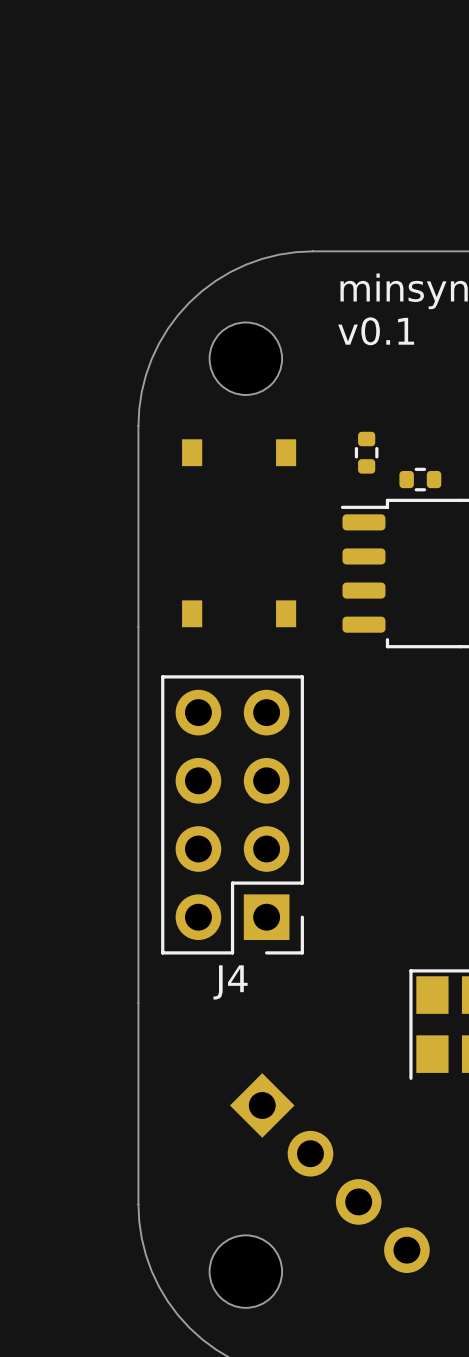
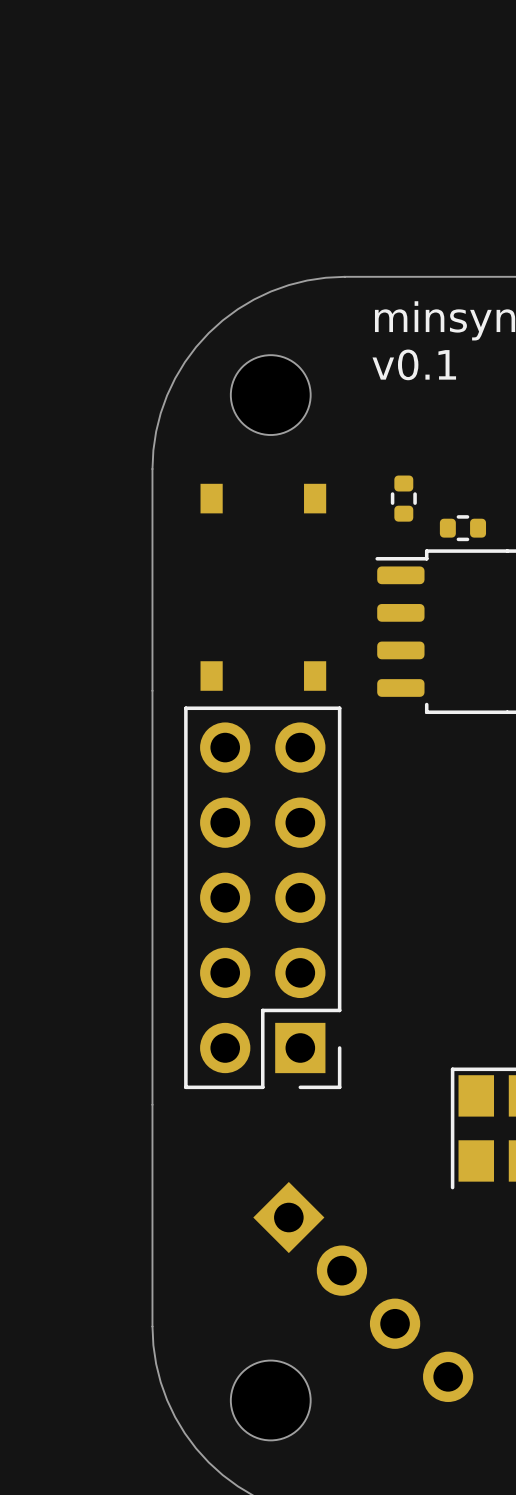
J4: (232, 814) -> none
part: none -> (262, 897)

